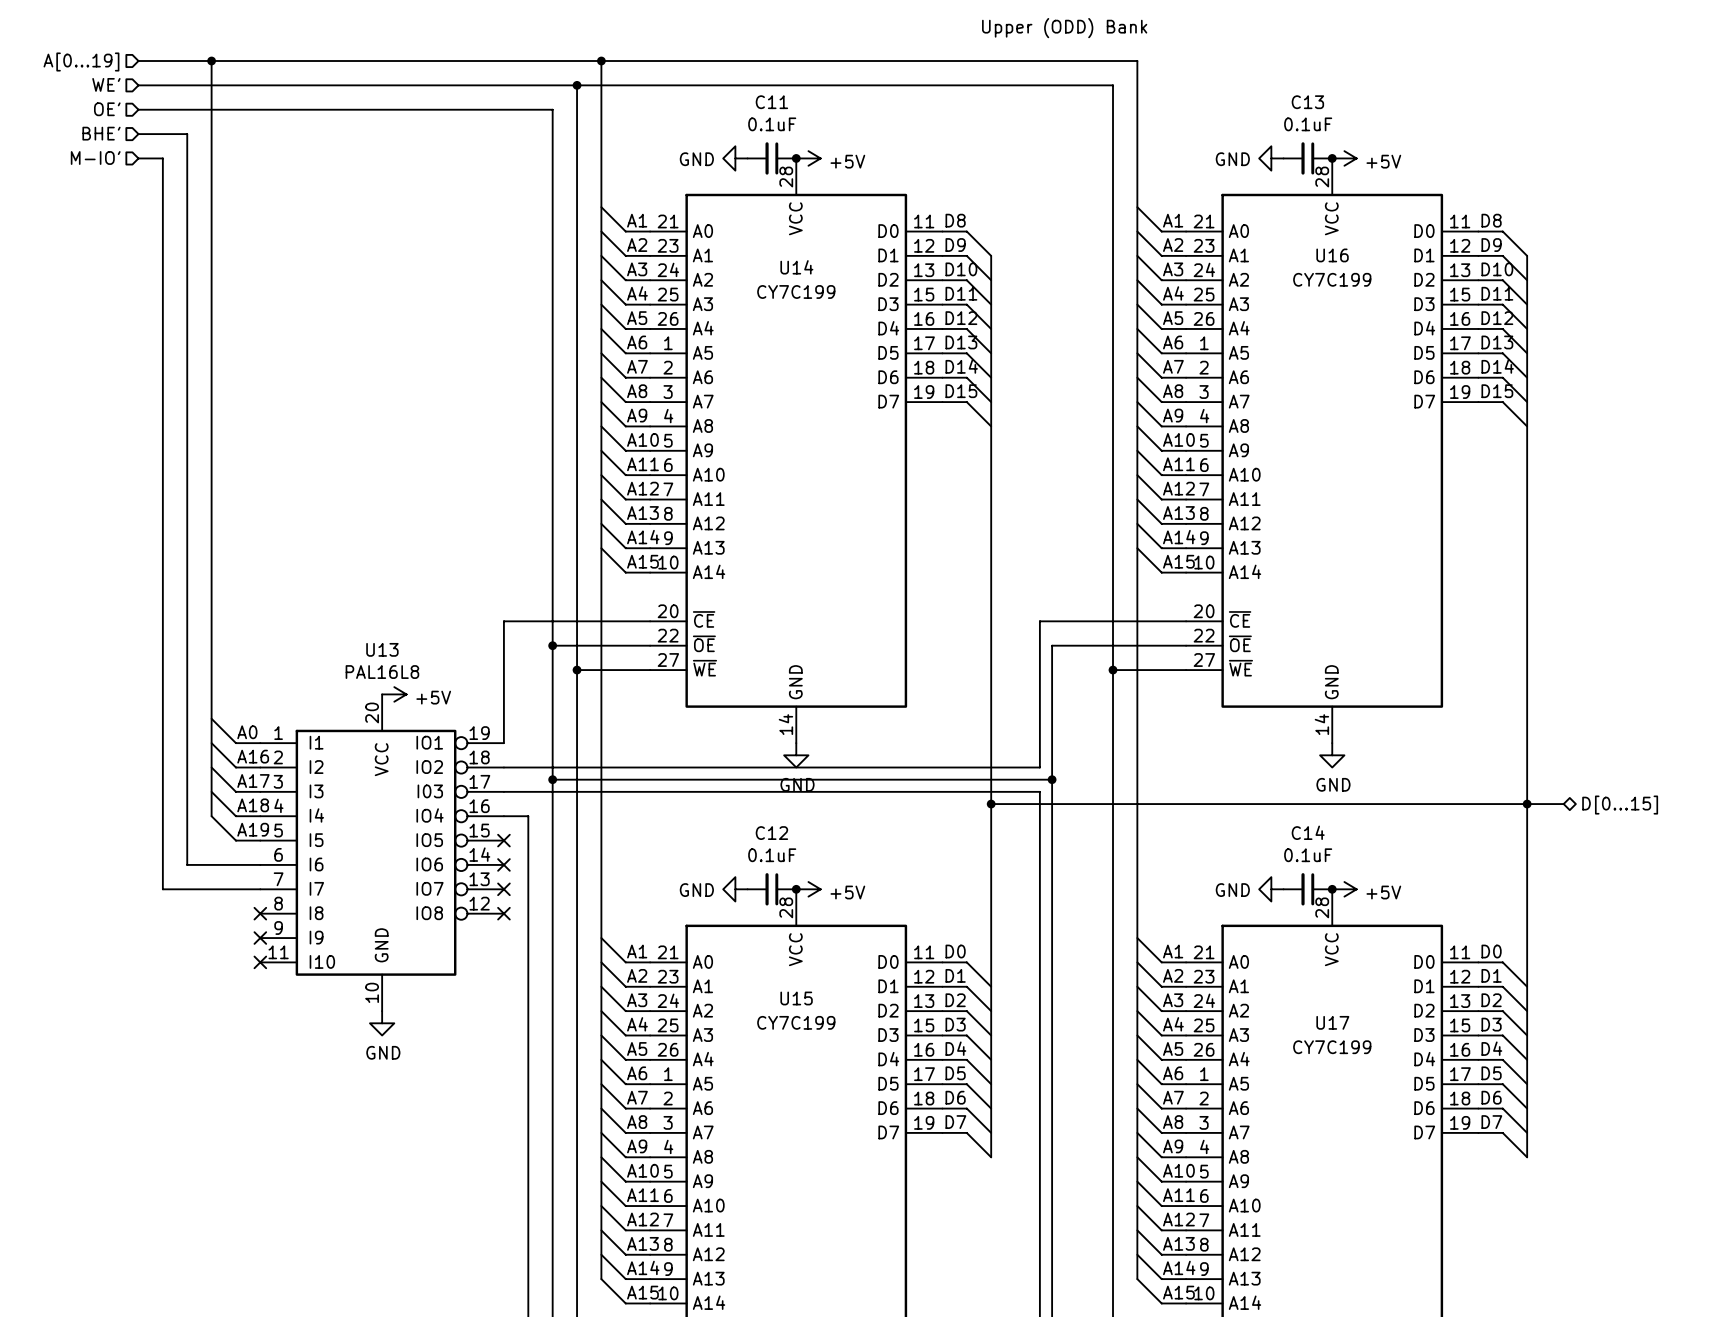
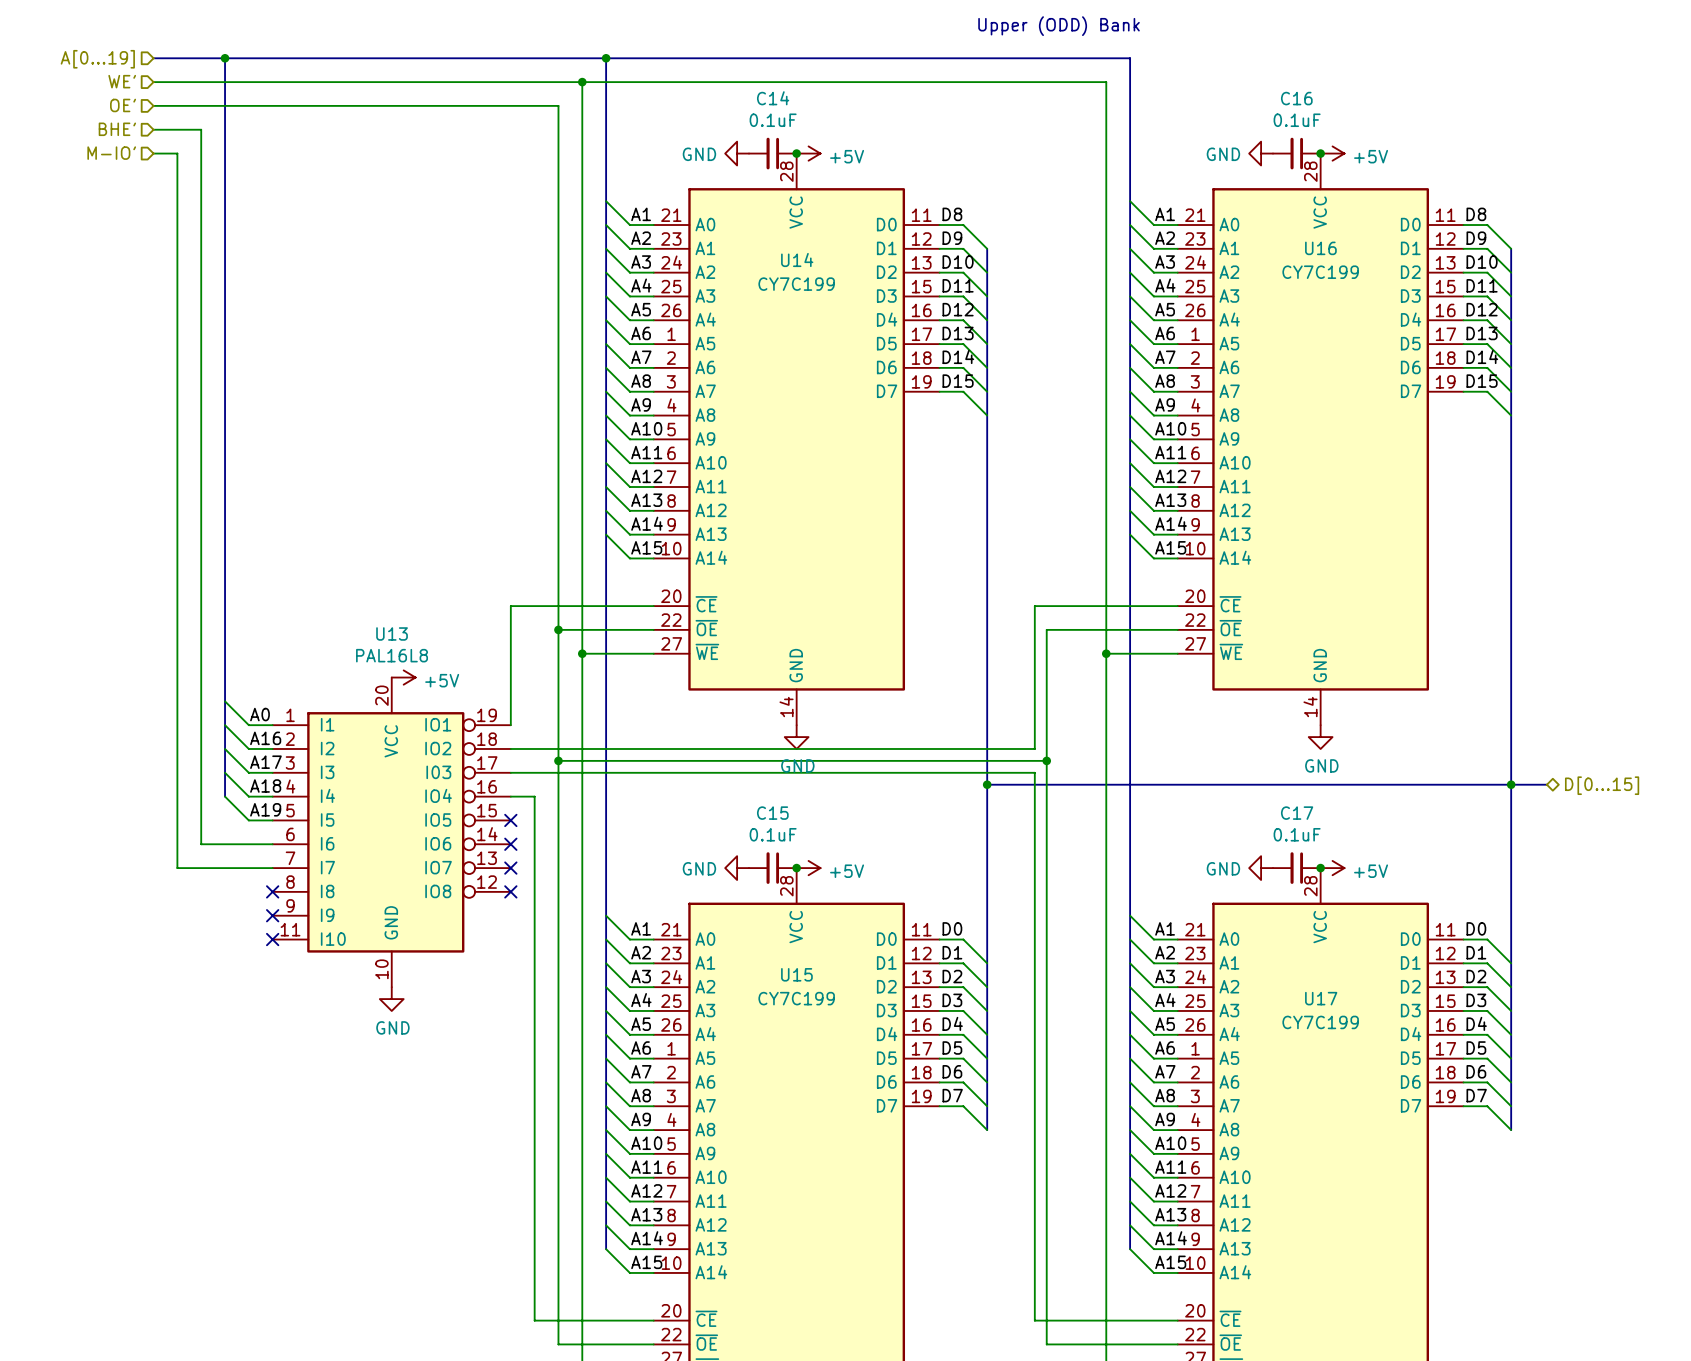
C11 name: C11 (771, 102) -> C14 (773, 98)
C13 name: C13 (1307, 102) -> C16 (1296, 98)
C14 name: C14 (1308, 832) -> C17 (1297, 813)
C12 name: C12 (771, 833) -> C15 (772, 813)

